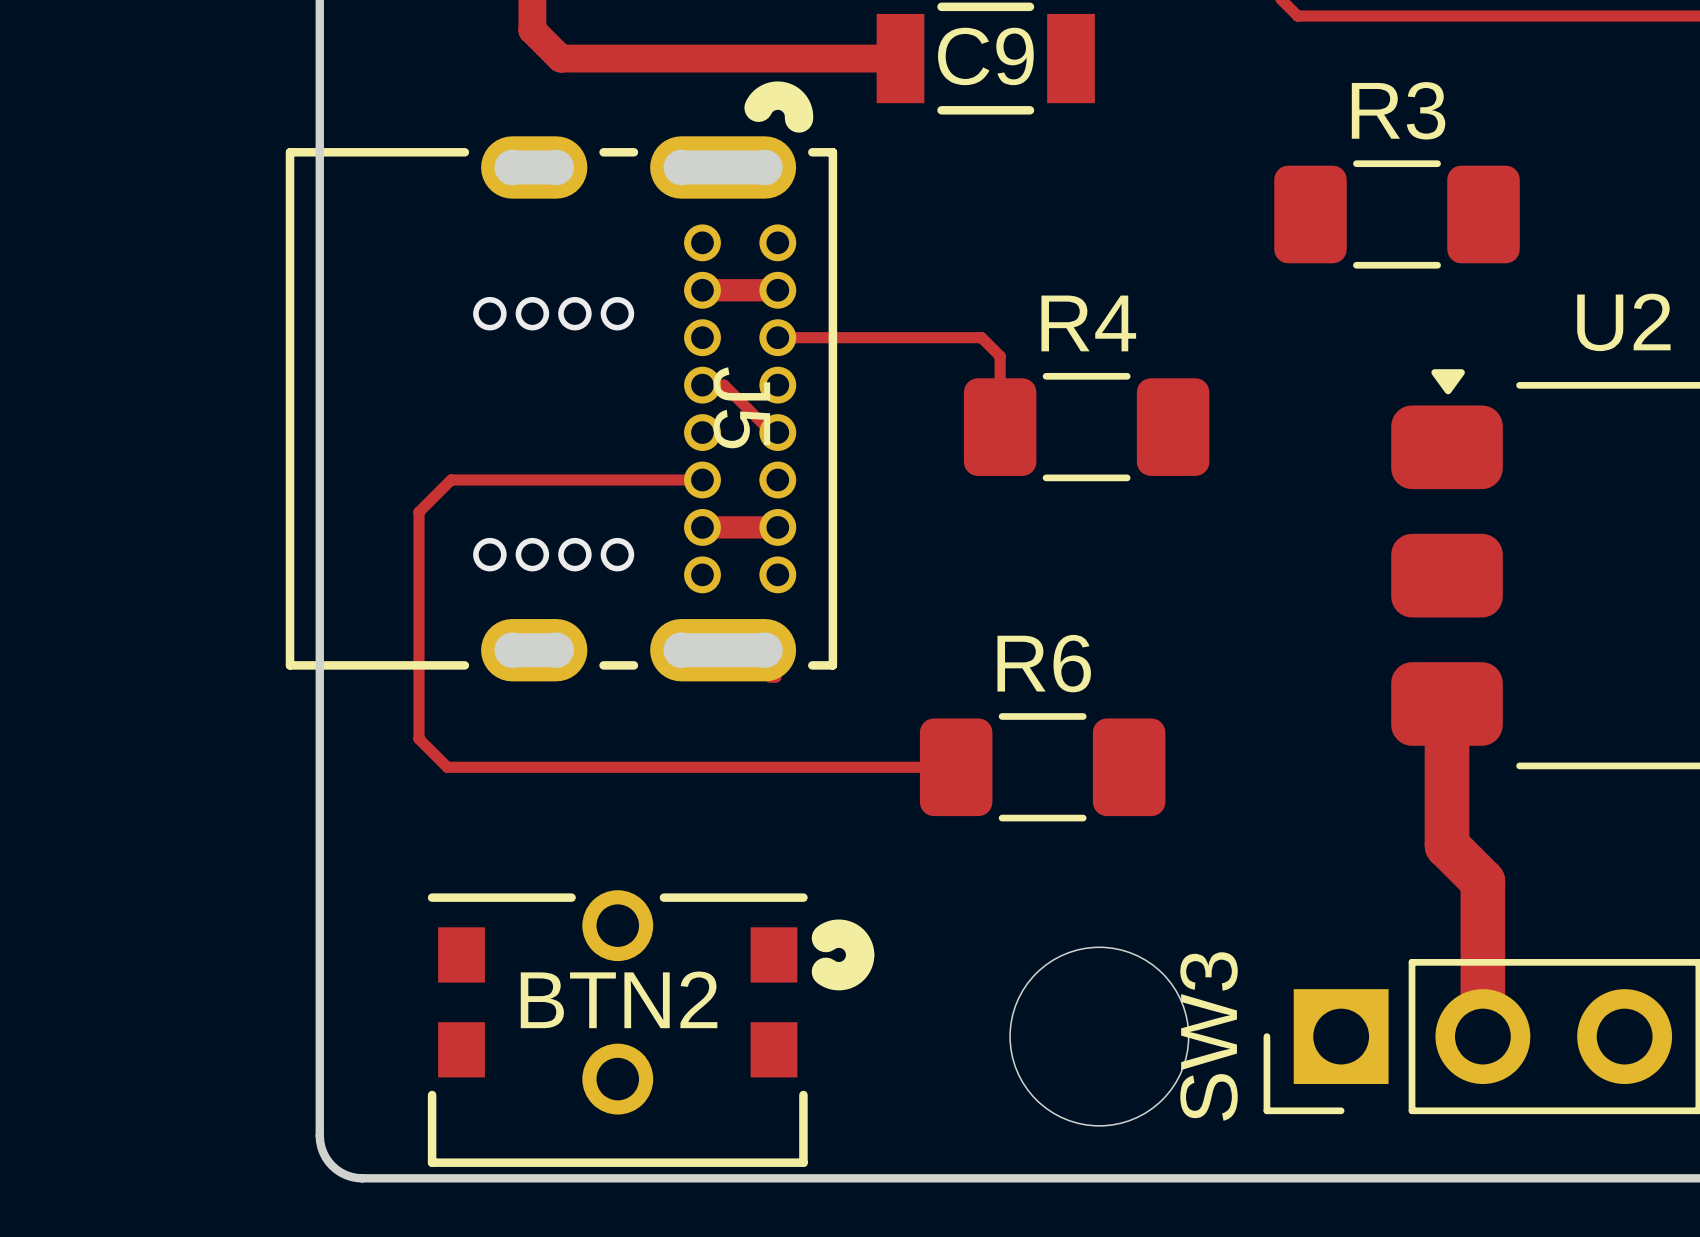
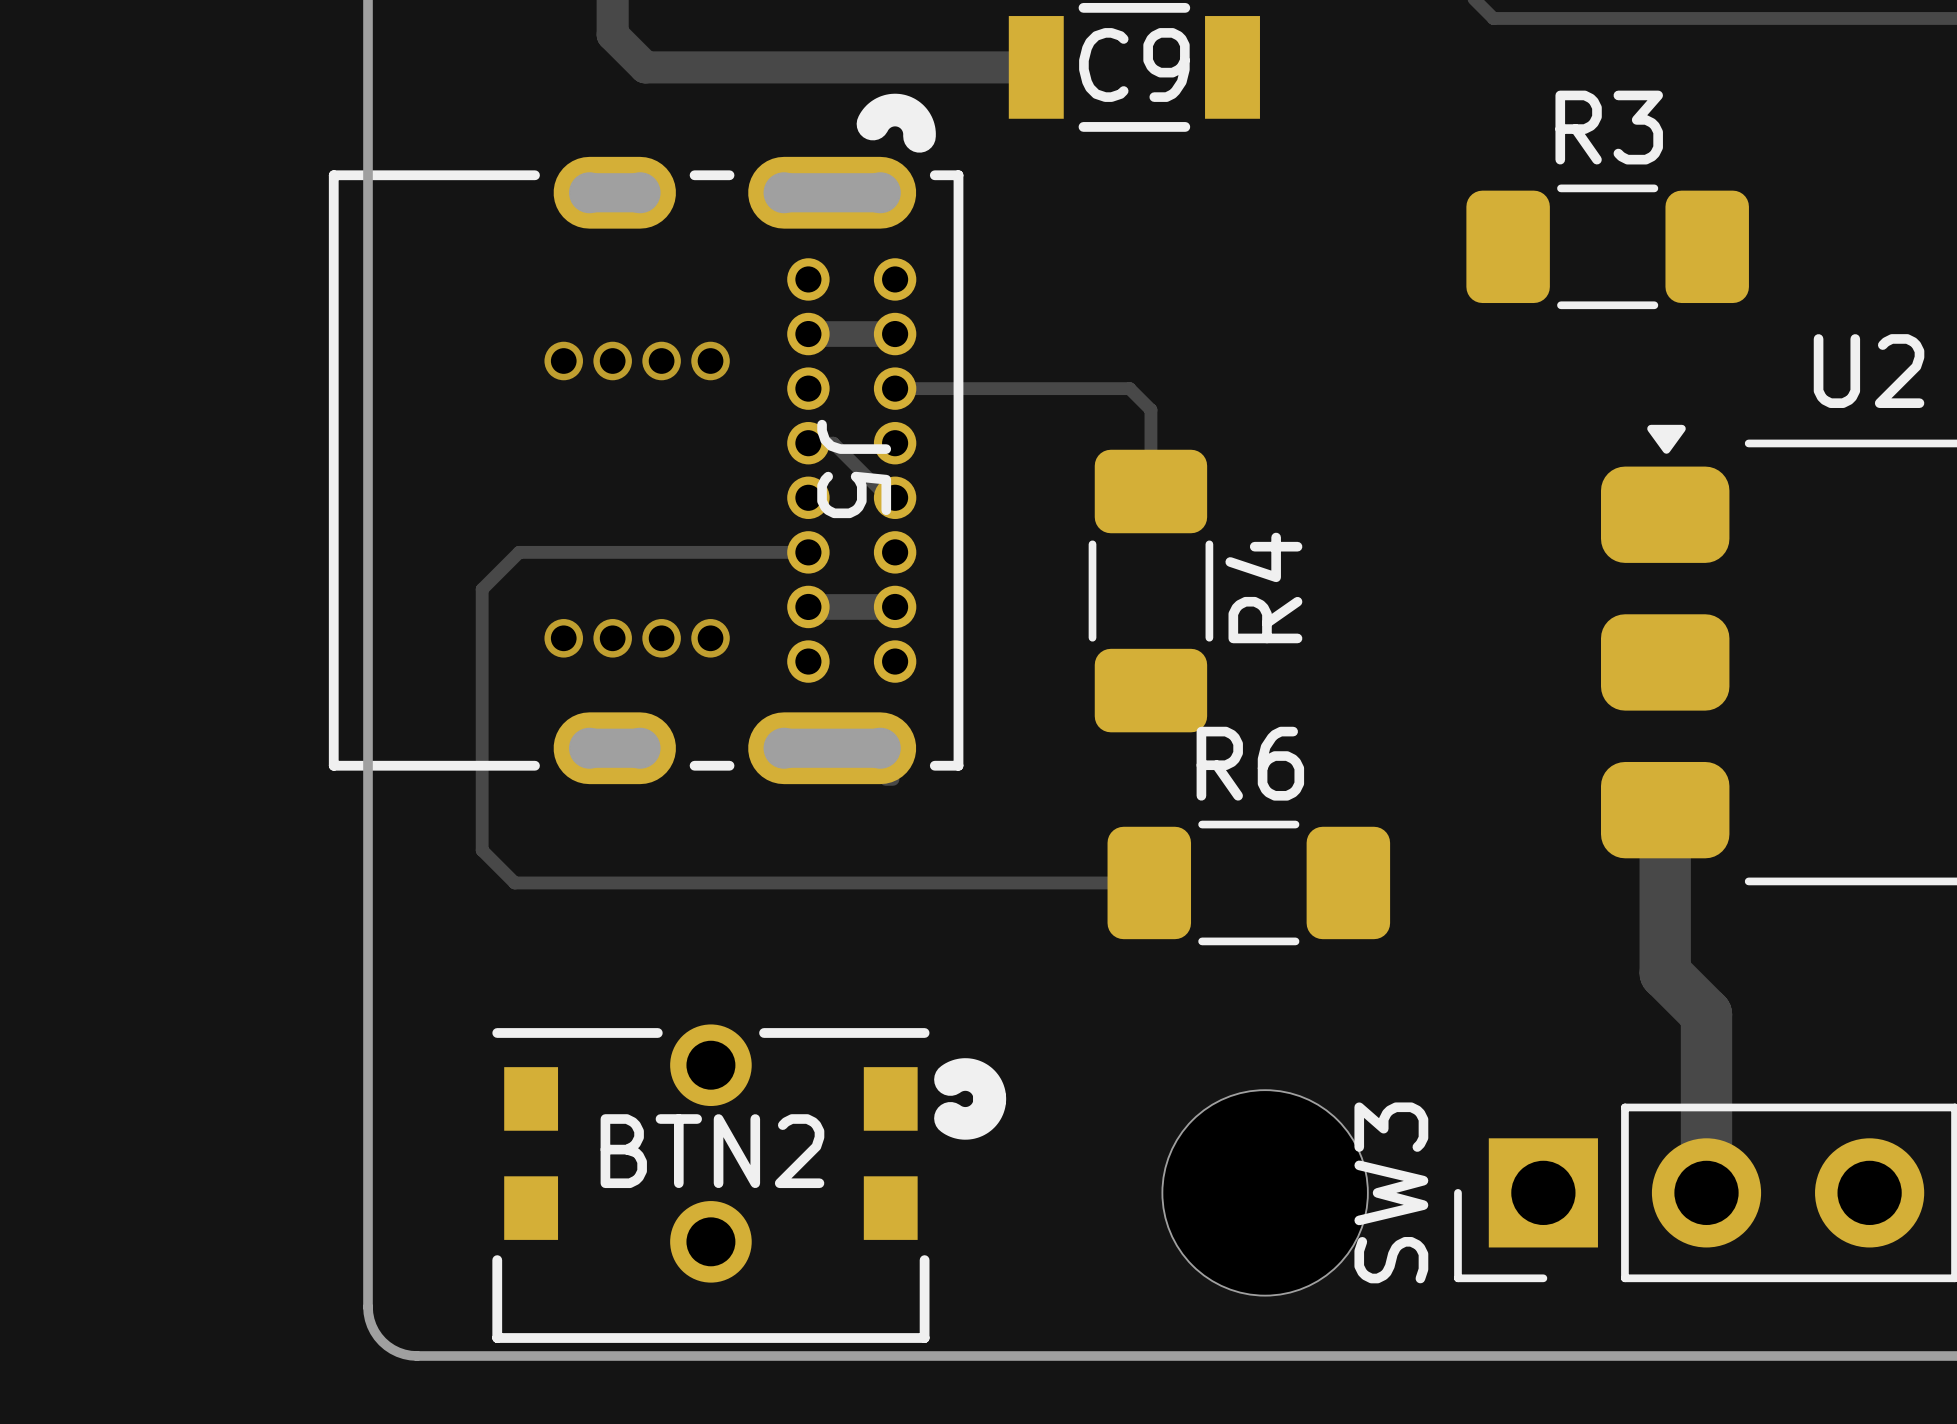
R4 rotation: 0° (1086, 427) -> 90° clockwise (1150, 591)
R6 position: (1042, 767) -> (1248, 882)

